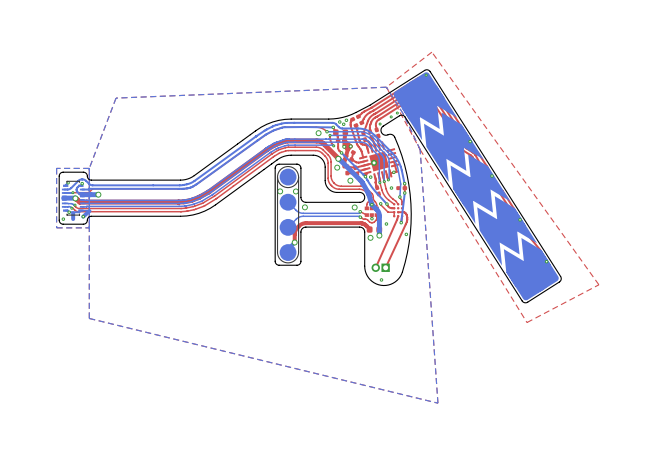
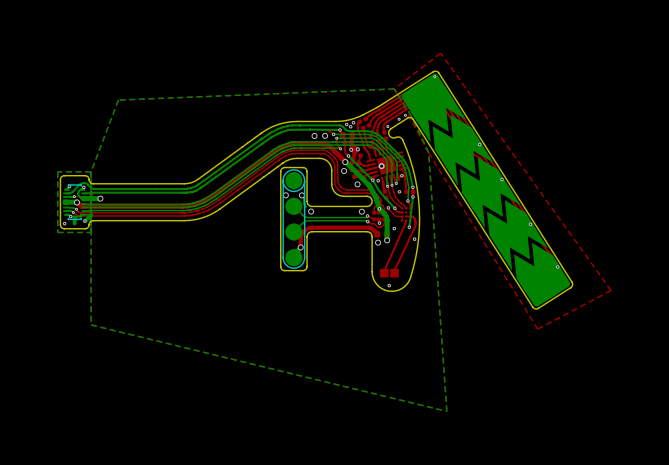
via: none -> (314, 135)
top track: none -> (404, 175) (406, 191)
bottom track: none -> (301, 195) (306, 207)
part footprint: [371, 263, 390, 272] -> [380, 268, 399, 278]

